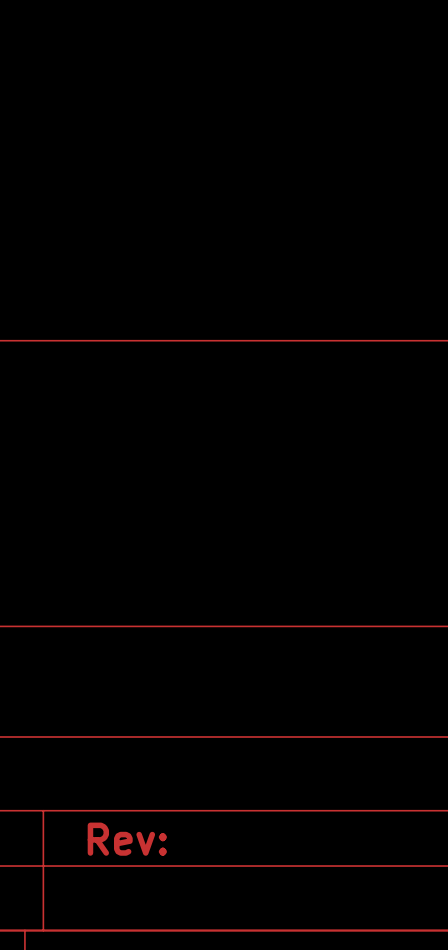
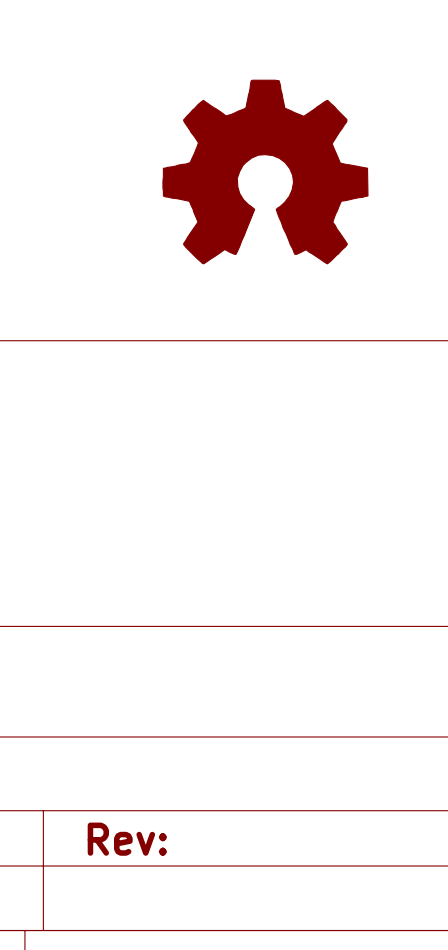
part: none -> (265, 171)

